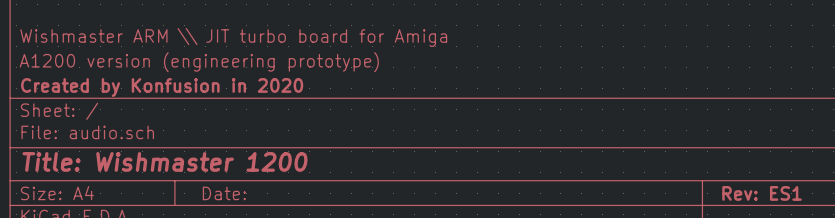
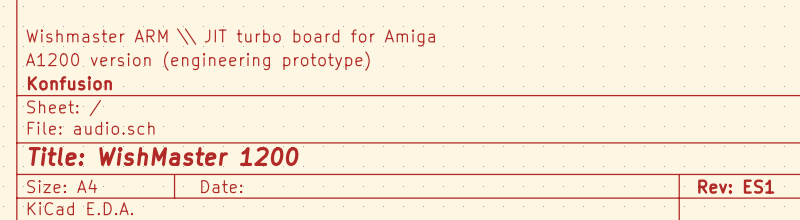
title block: Created by Konfusion in 2020 (162, 87) -> Konfusion (69, 83)
title block: Title: Wishmaster 1200 (165, 161) -> Title: WishMaster 1200 (163, 156)

